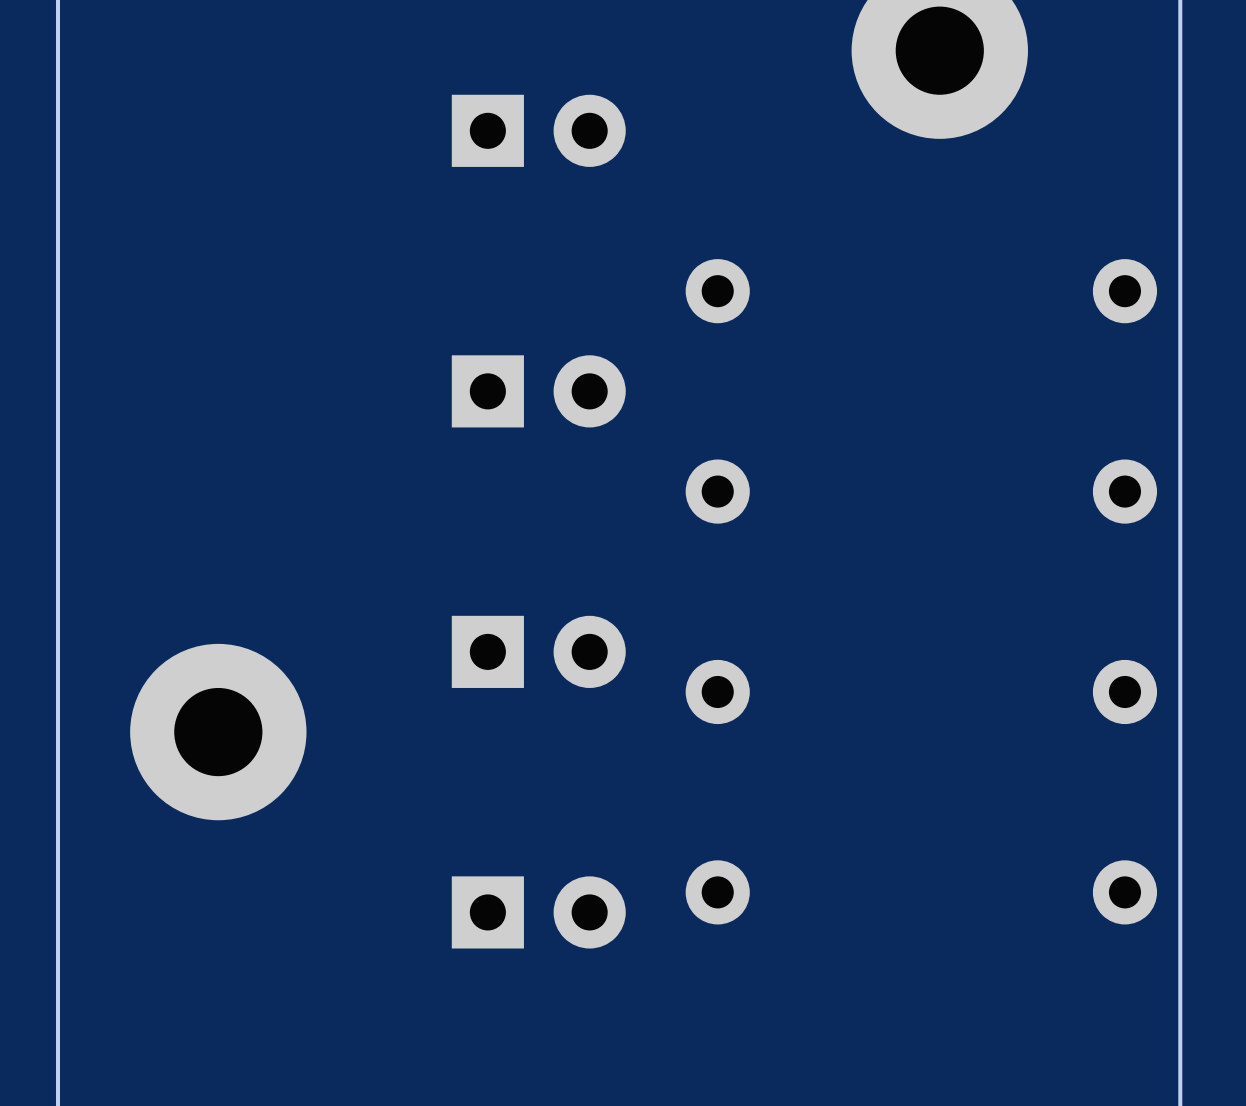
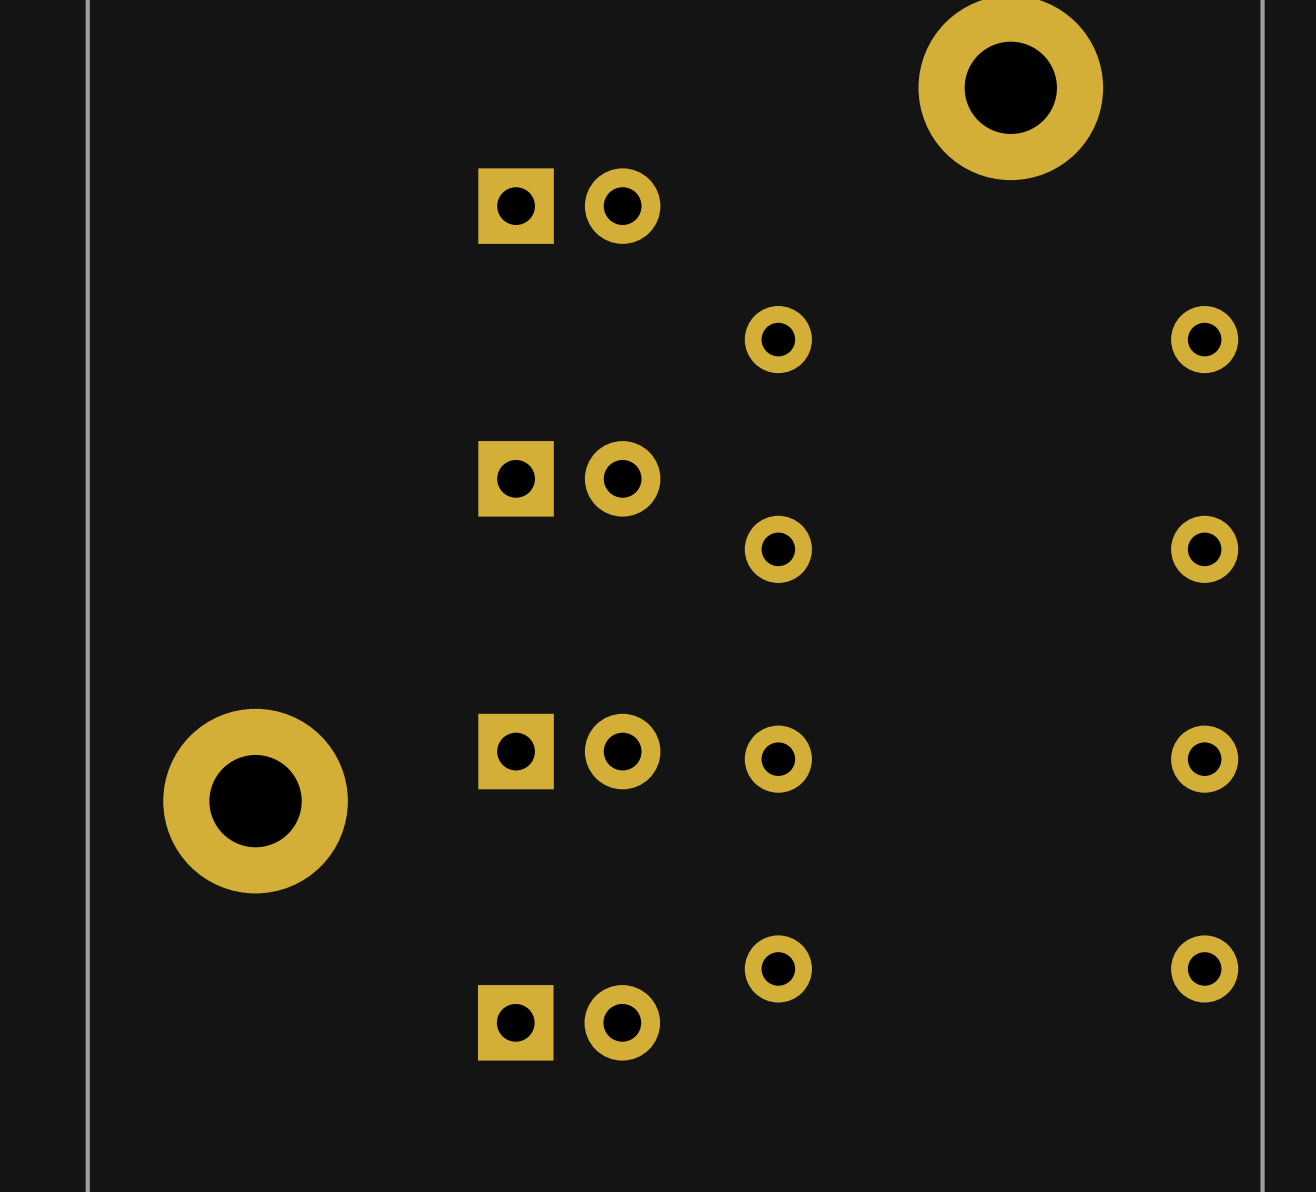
part position: (538, 130) -> (569, 206)
part position: (538, 391) -> (569, 478)
part position: (538, 651) -> (569, 751)
part position: (538, 912) -> (569, 1022)

